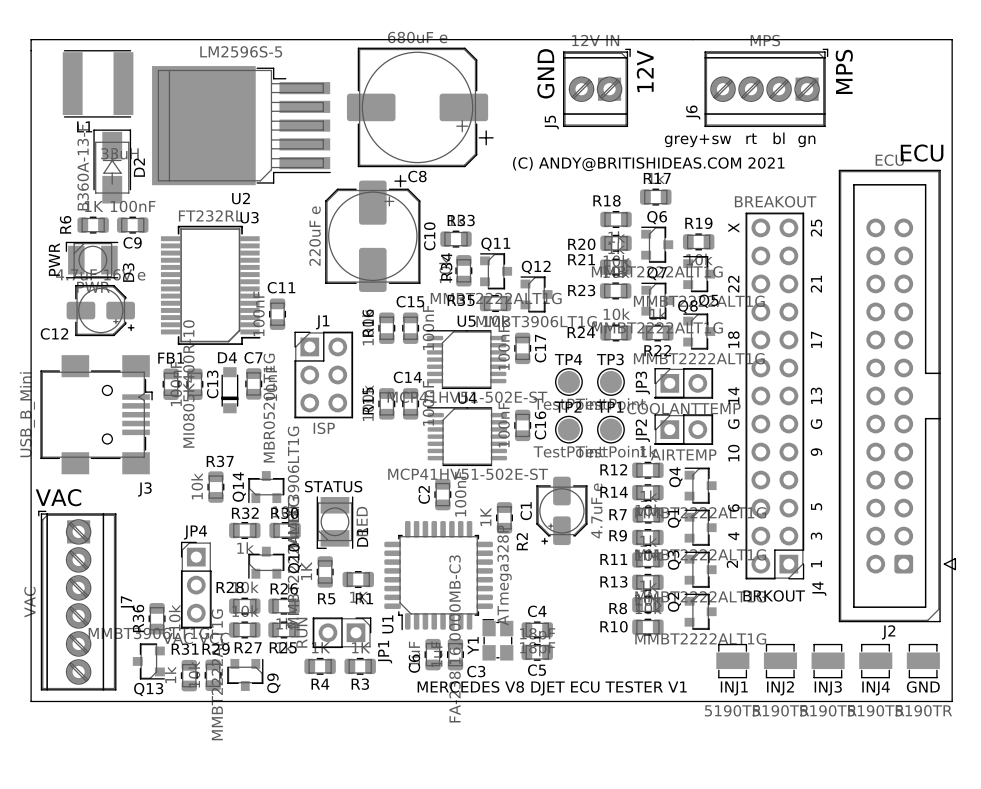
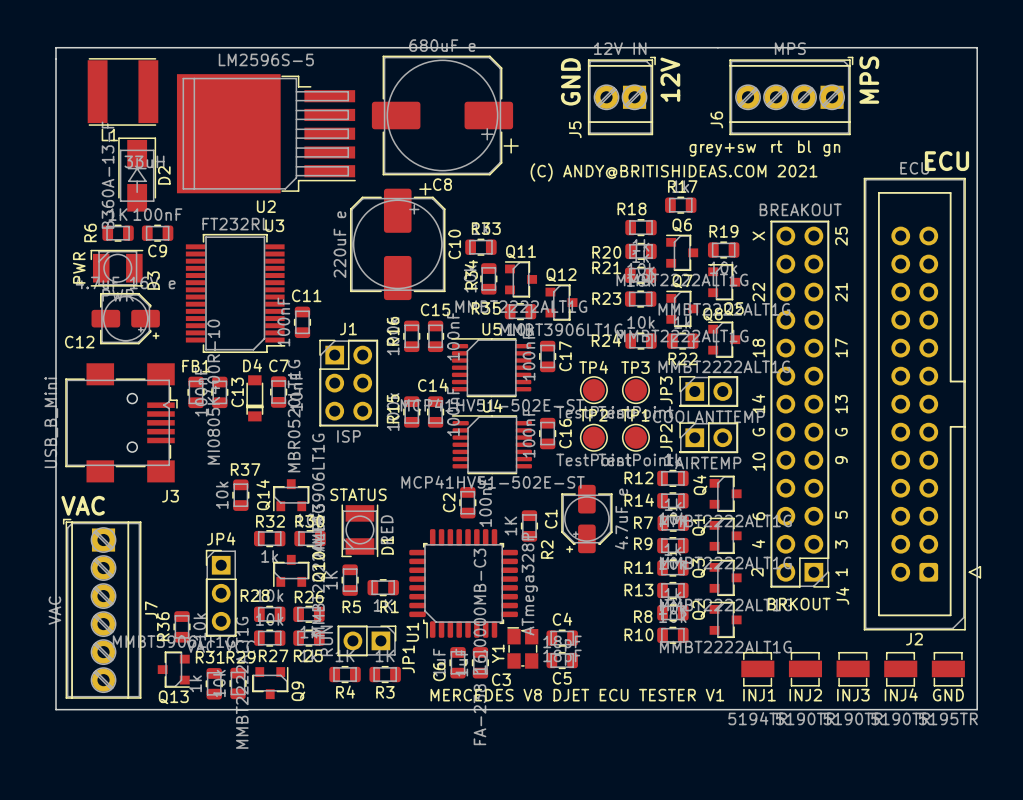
part value: 5190TR (733, 710) -> 5194TR (757, 718)
part value: 5190TR (923, 710) -> 5195TR (948, 718)

